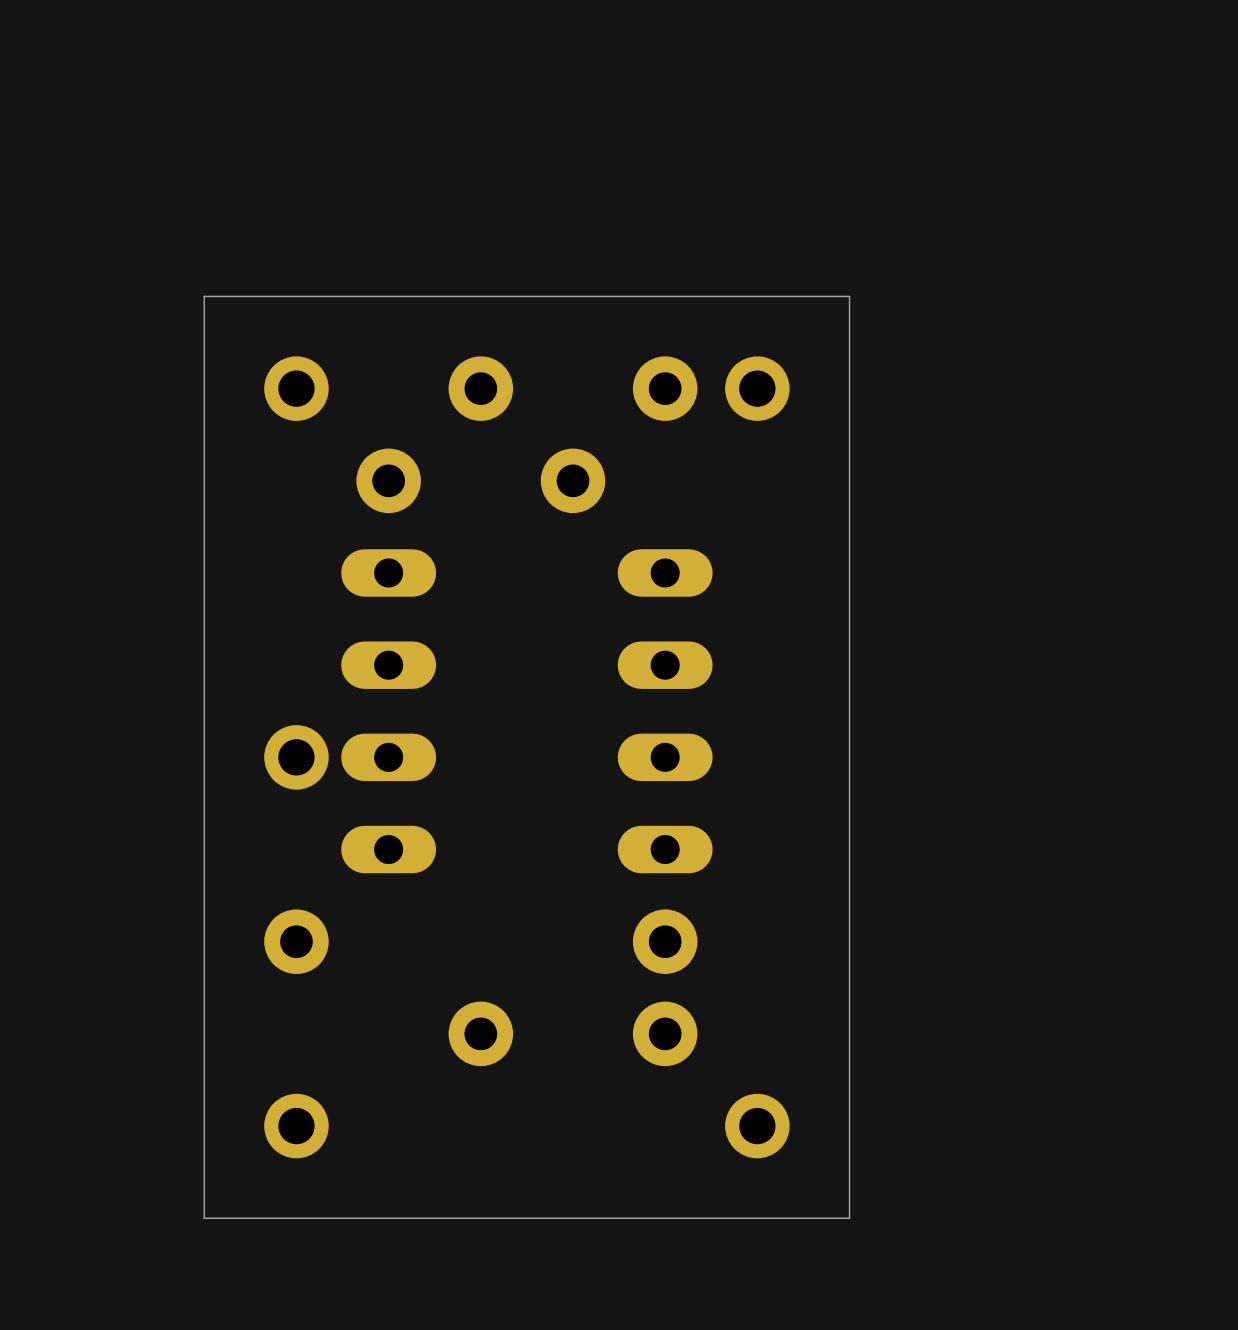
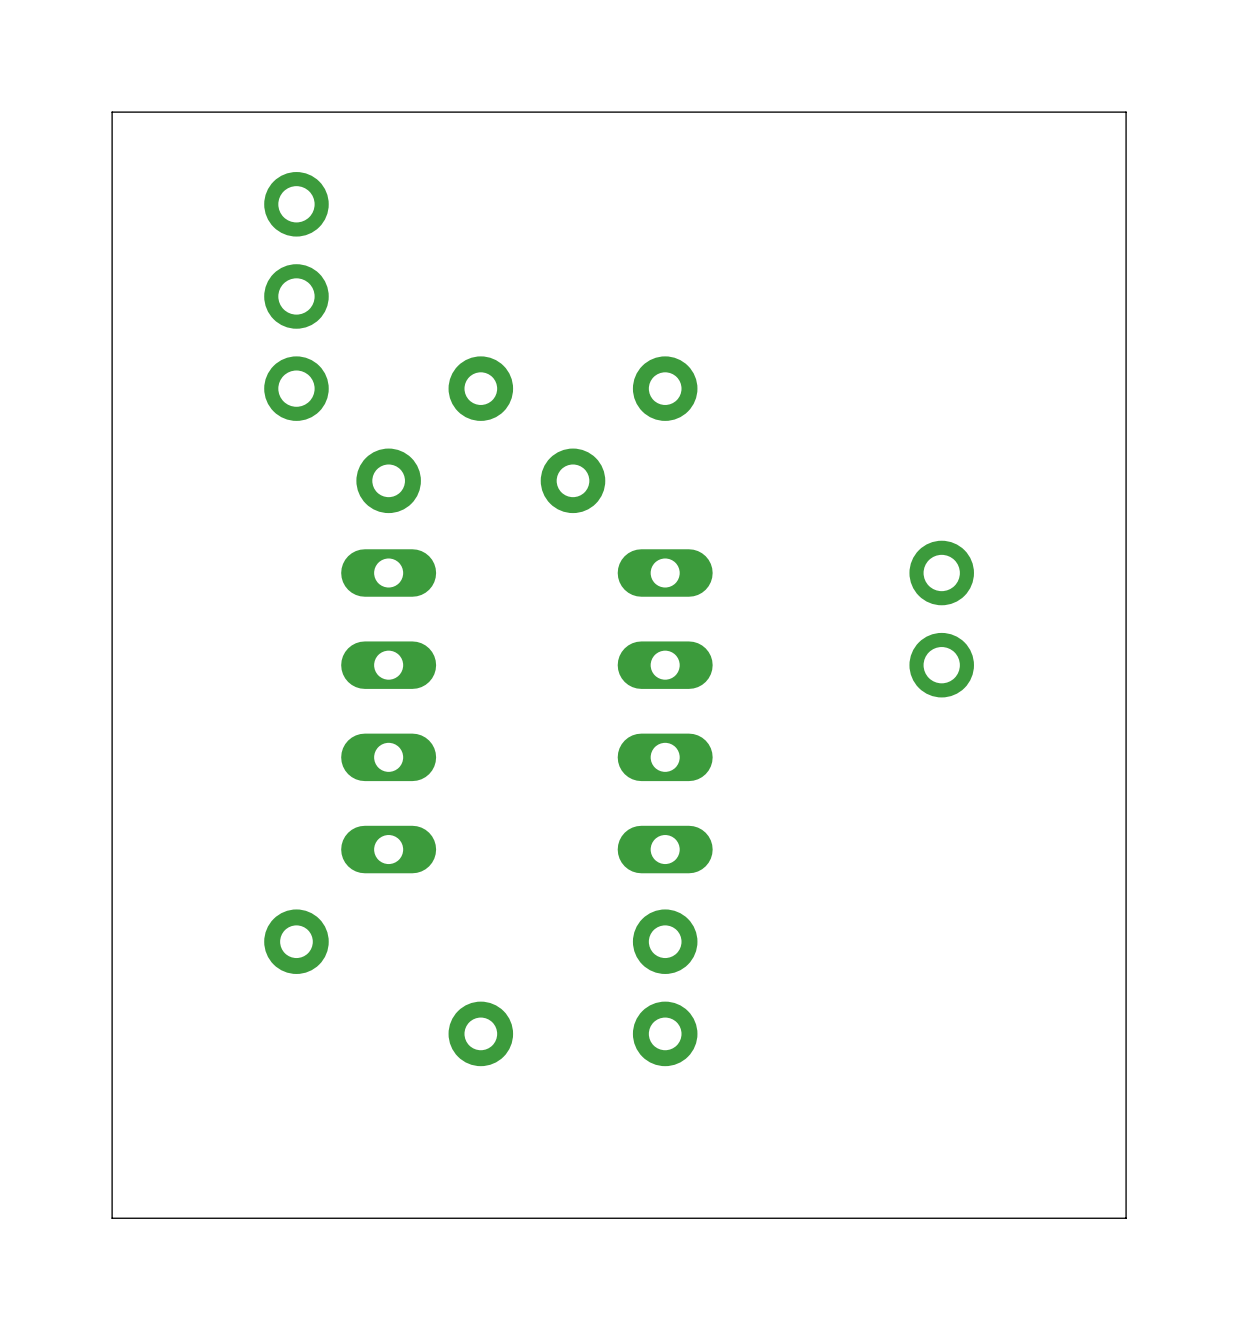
part: none -> (296, 204)
part: none -> (296, 296)
part: (757, 388) -> none
part: none -> (941, 573)
part: none -> (941, 665)
part: (296, 757) -> none
part: (296, 1126) -> none
part: (757, 1126) -> none
board edge: (849, 1218) (849, 296) (204, 296) (204, 1218) -> (849, 1218) (1126, 1218) (1126, 112) (112, 112) (112, 1218) (204, 1218)

